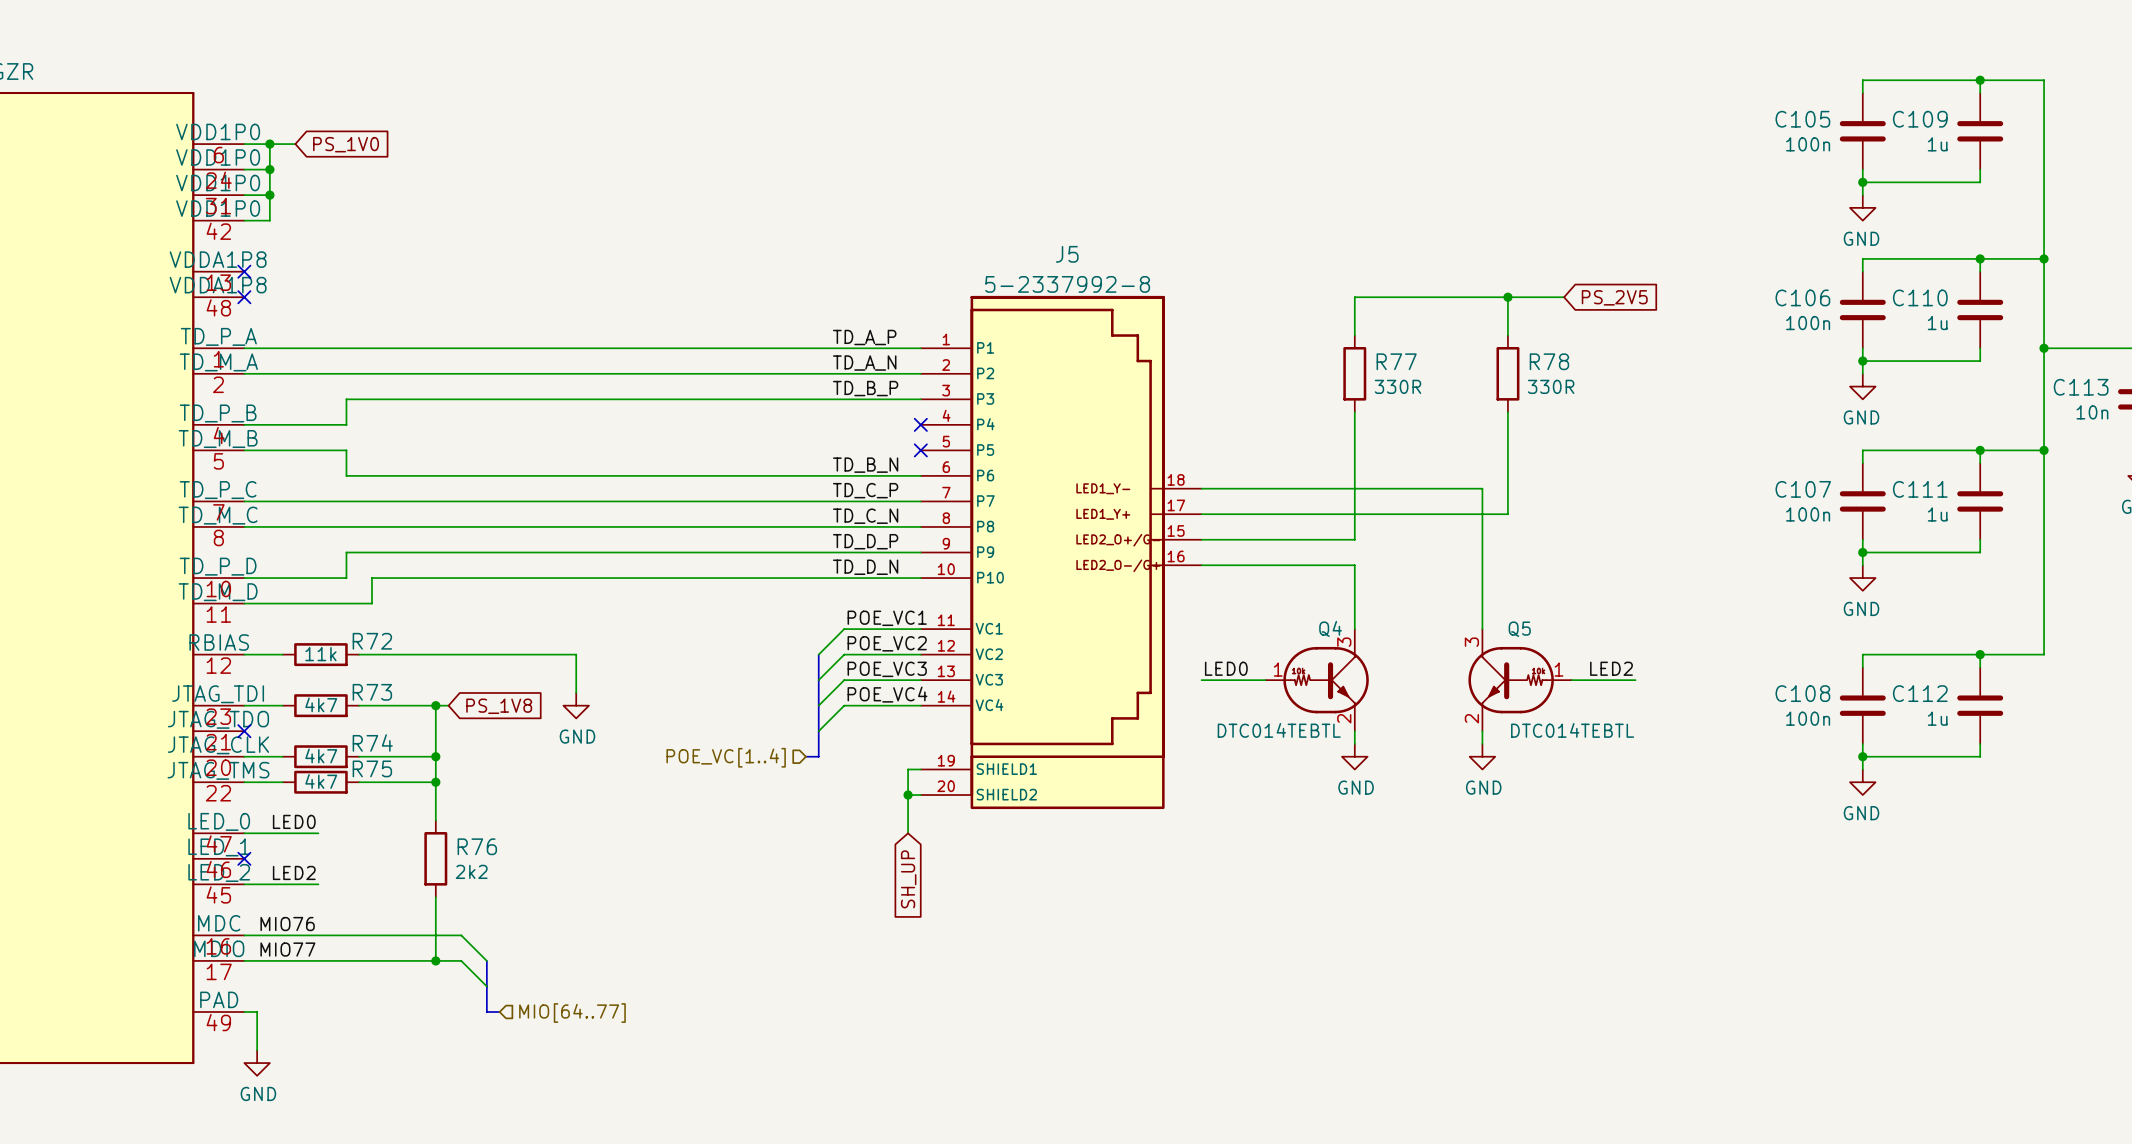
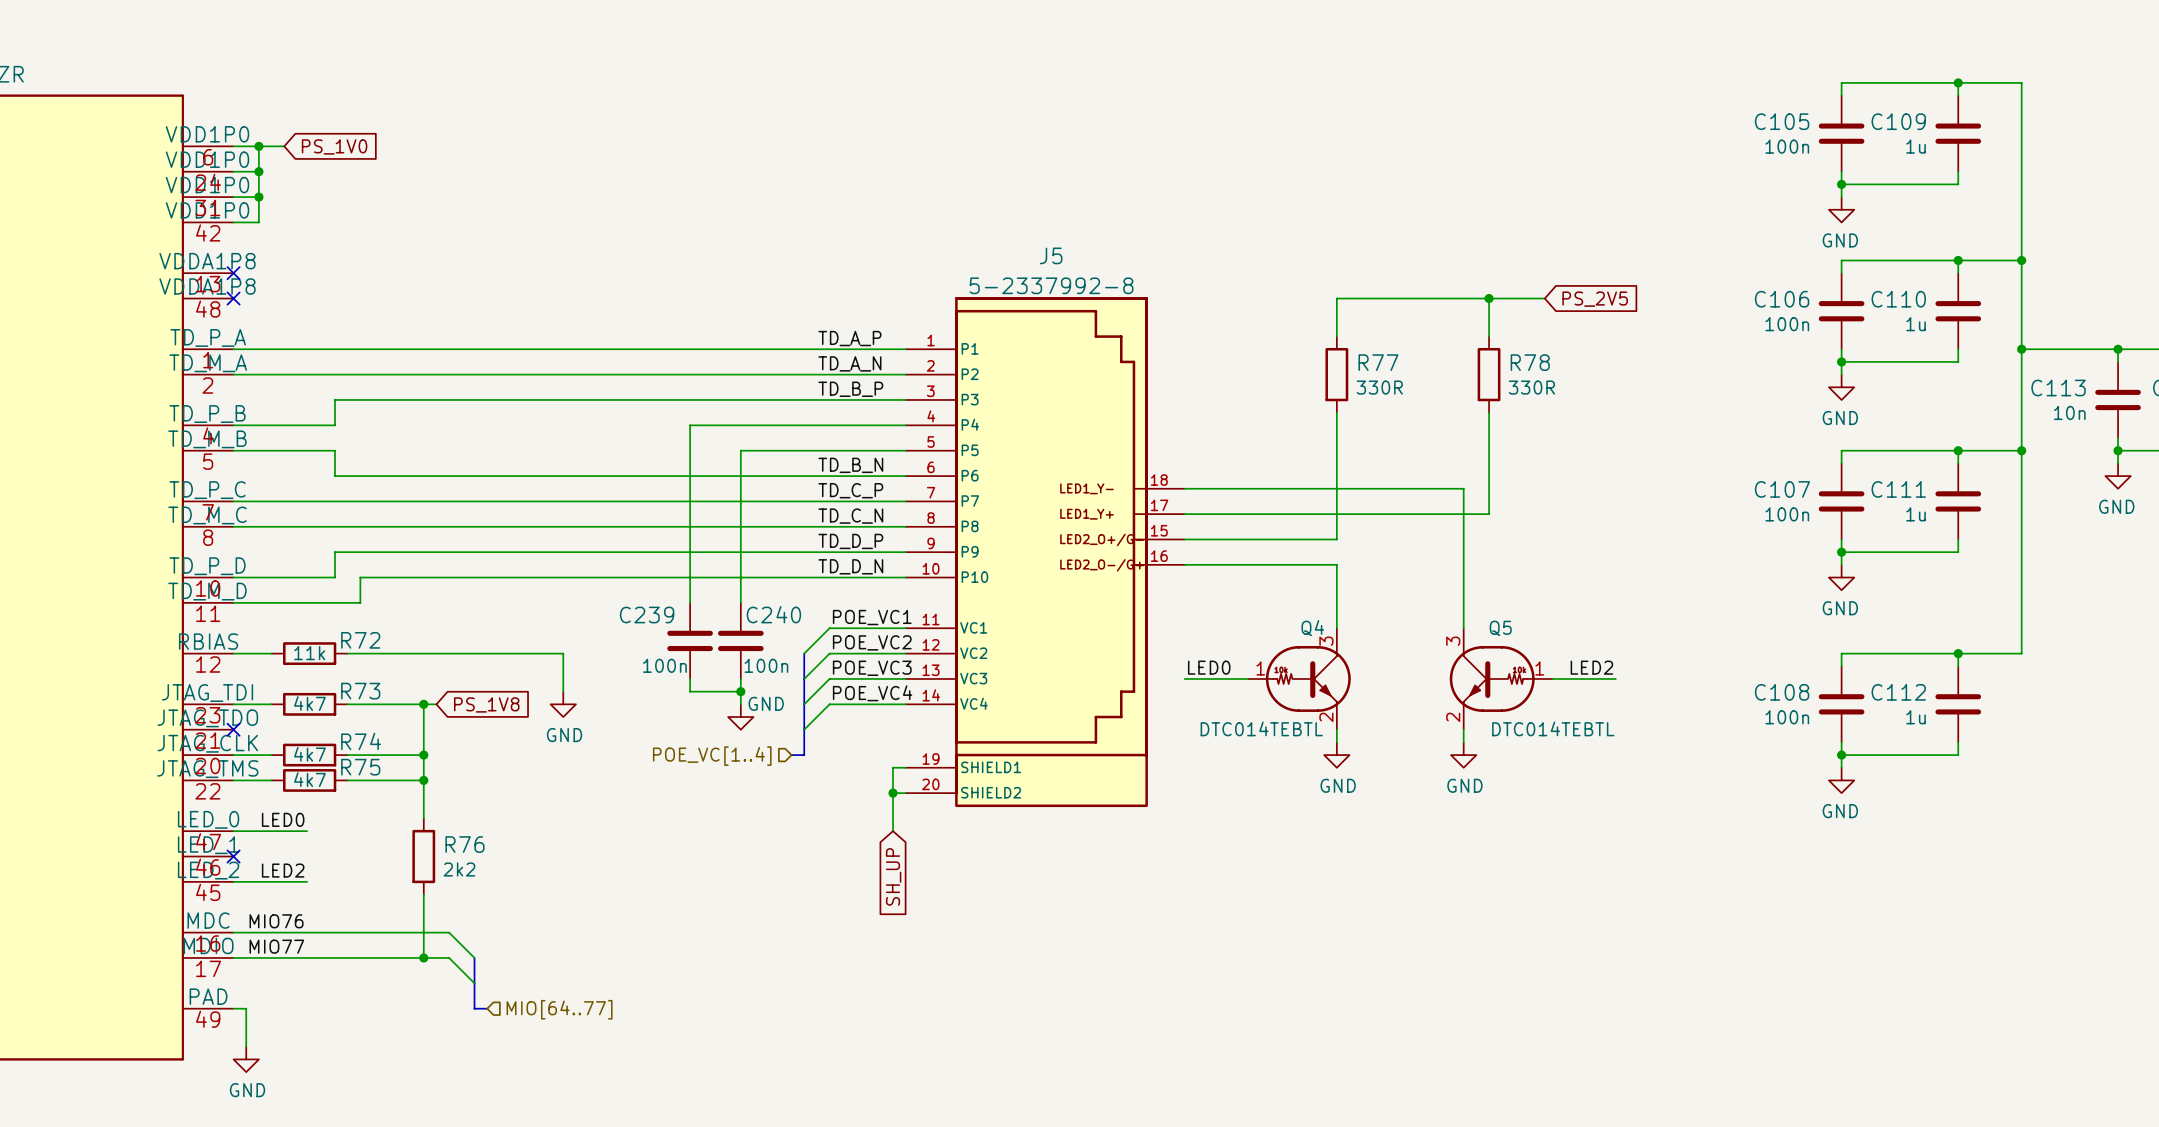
wire: none -> (905, 425) (690, 425) (690, 602)
no-connect mark: (920, 424) -> none
wire: none -> (905, 450) (740, 450) (740, 602)
no-connect mark: (920, 450) -> none
C239: none -> (690, 640)
C240: none -> (740, 640)
wire: none -> (690, 678) (690, 691) (740, 691)
wire: none -> (740, 678) (740, 704)
junction: none -> (740, 691)
power symbol: none -> GND (740, 717)

